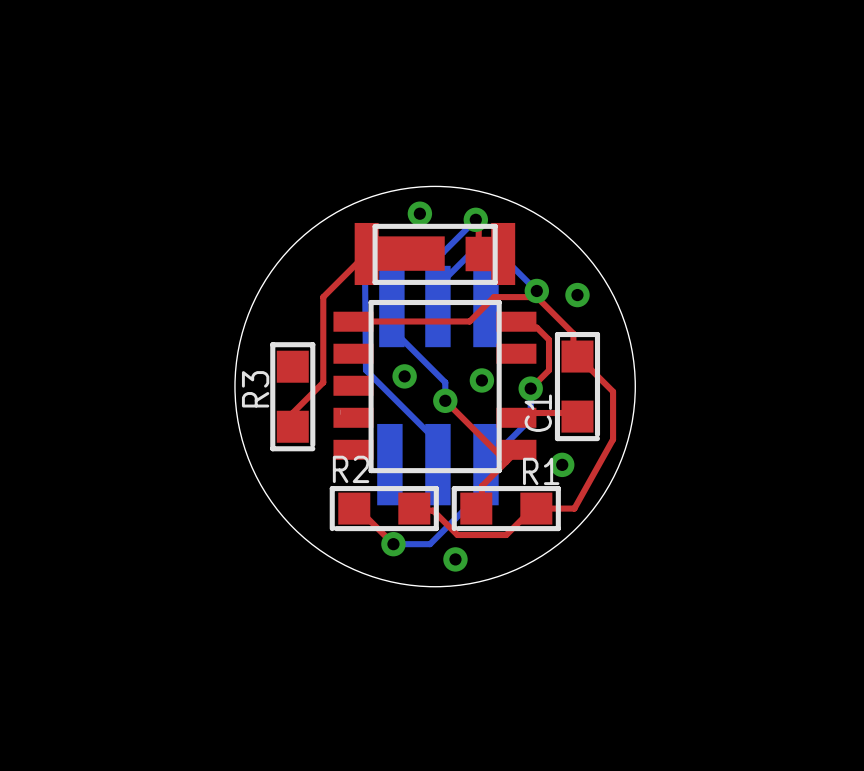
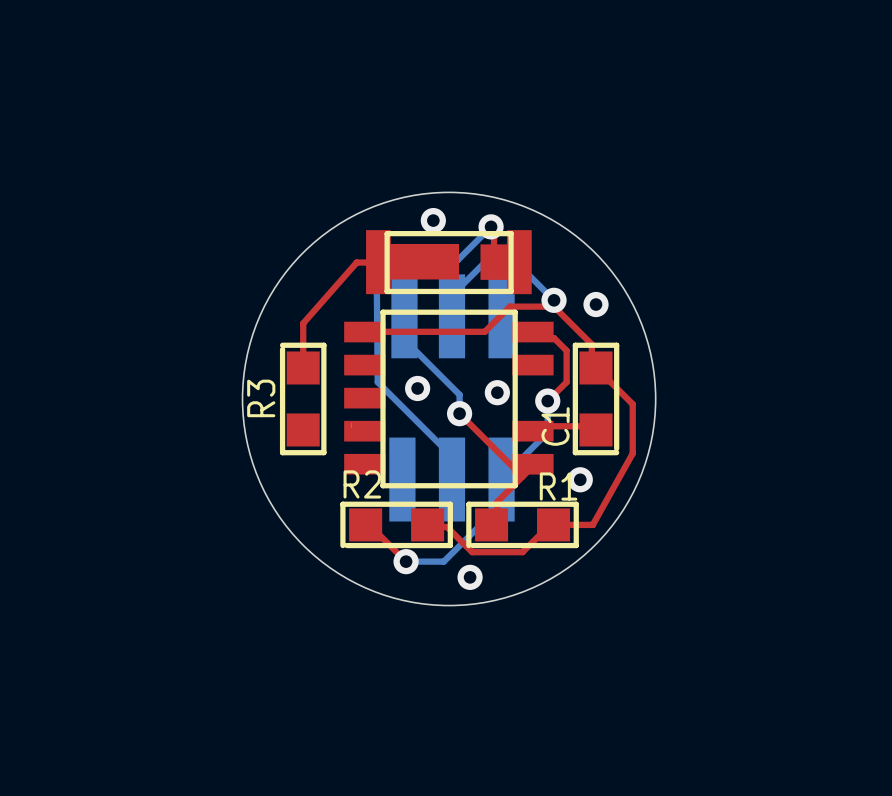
top track: (365, 254) (323, 297) (323, 382) (292, 413) (292, 426) -> (377, 262) (356, 262) (303, 323) (303, 367)
R3 rotation: 0° (292, 396) -> 180° (303, 398)

